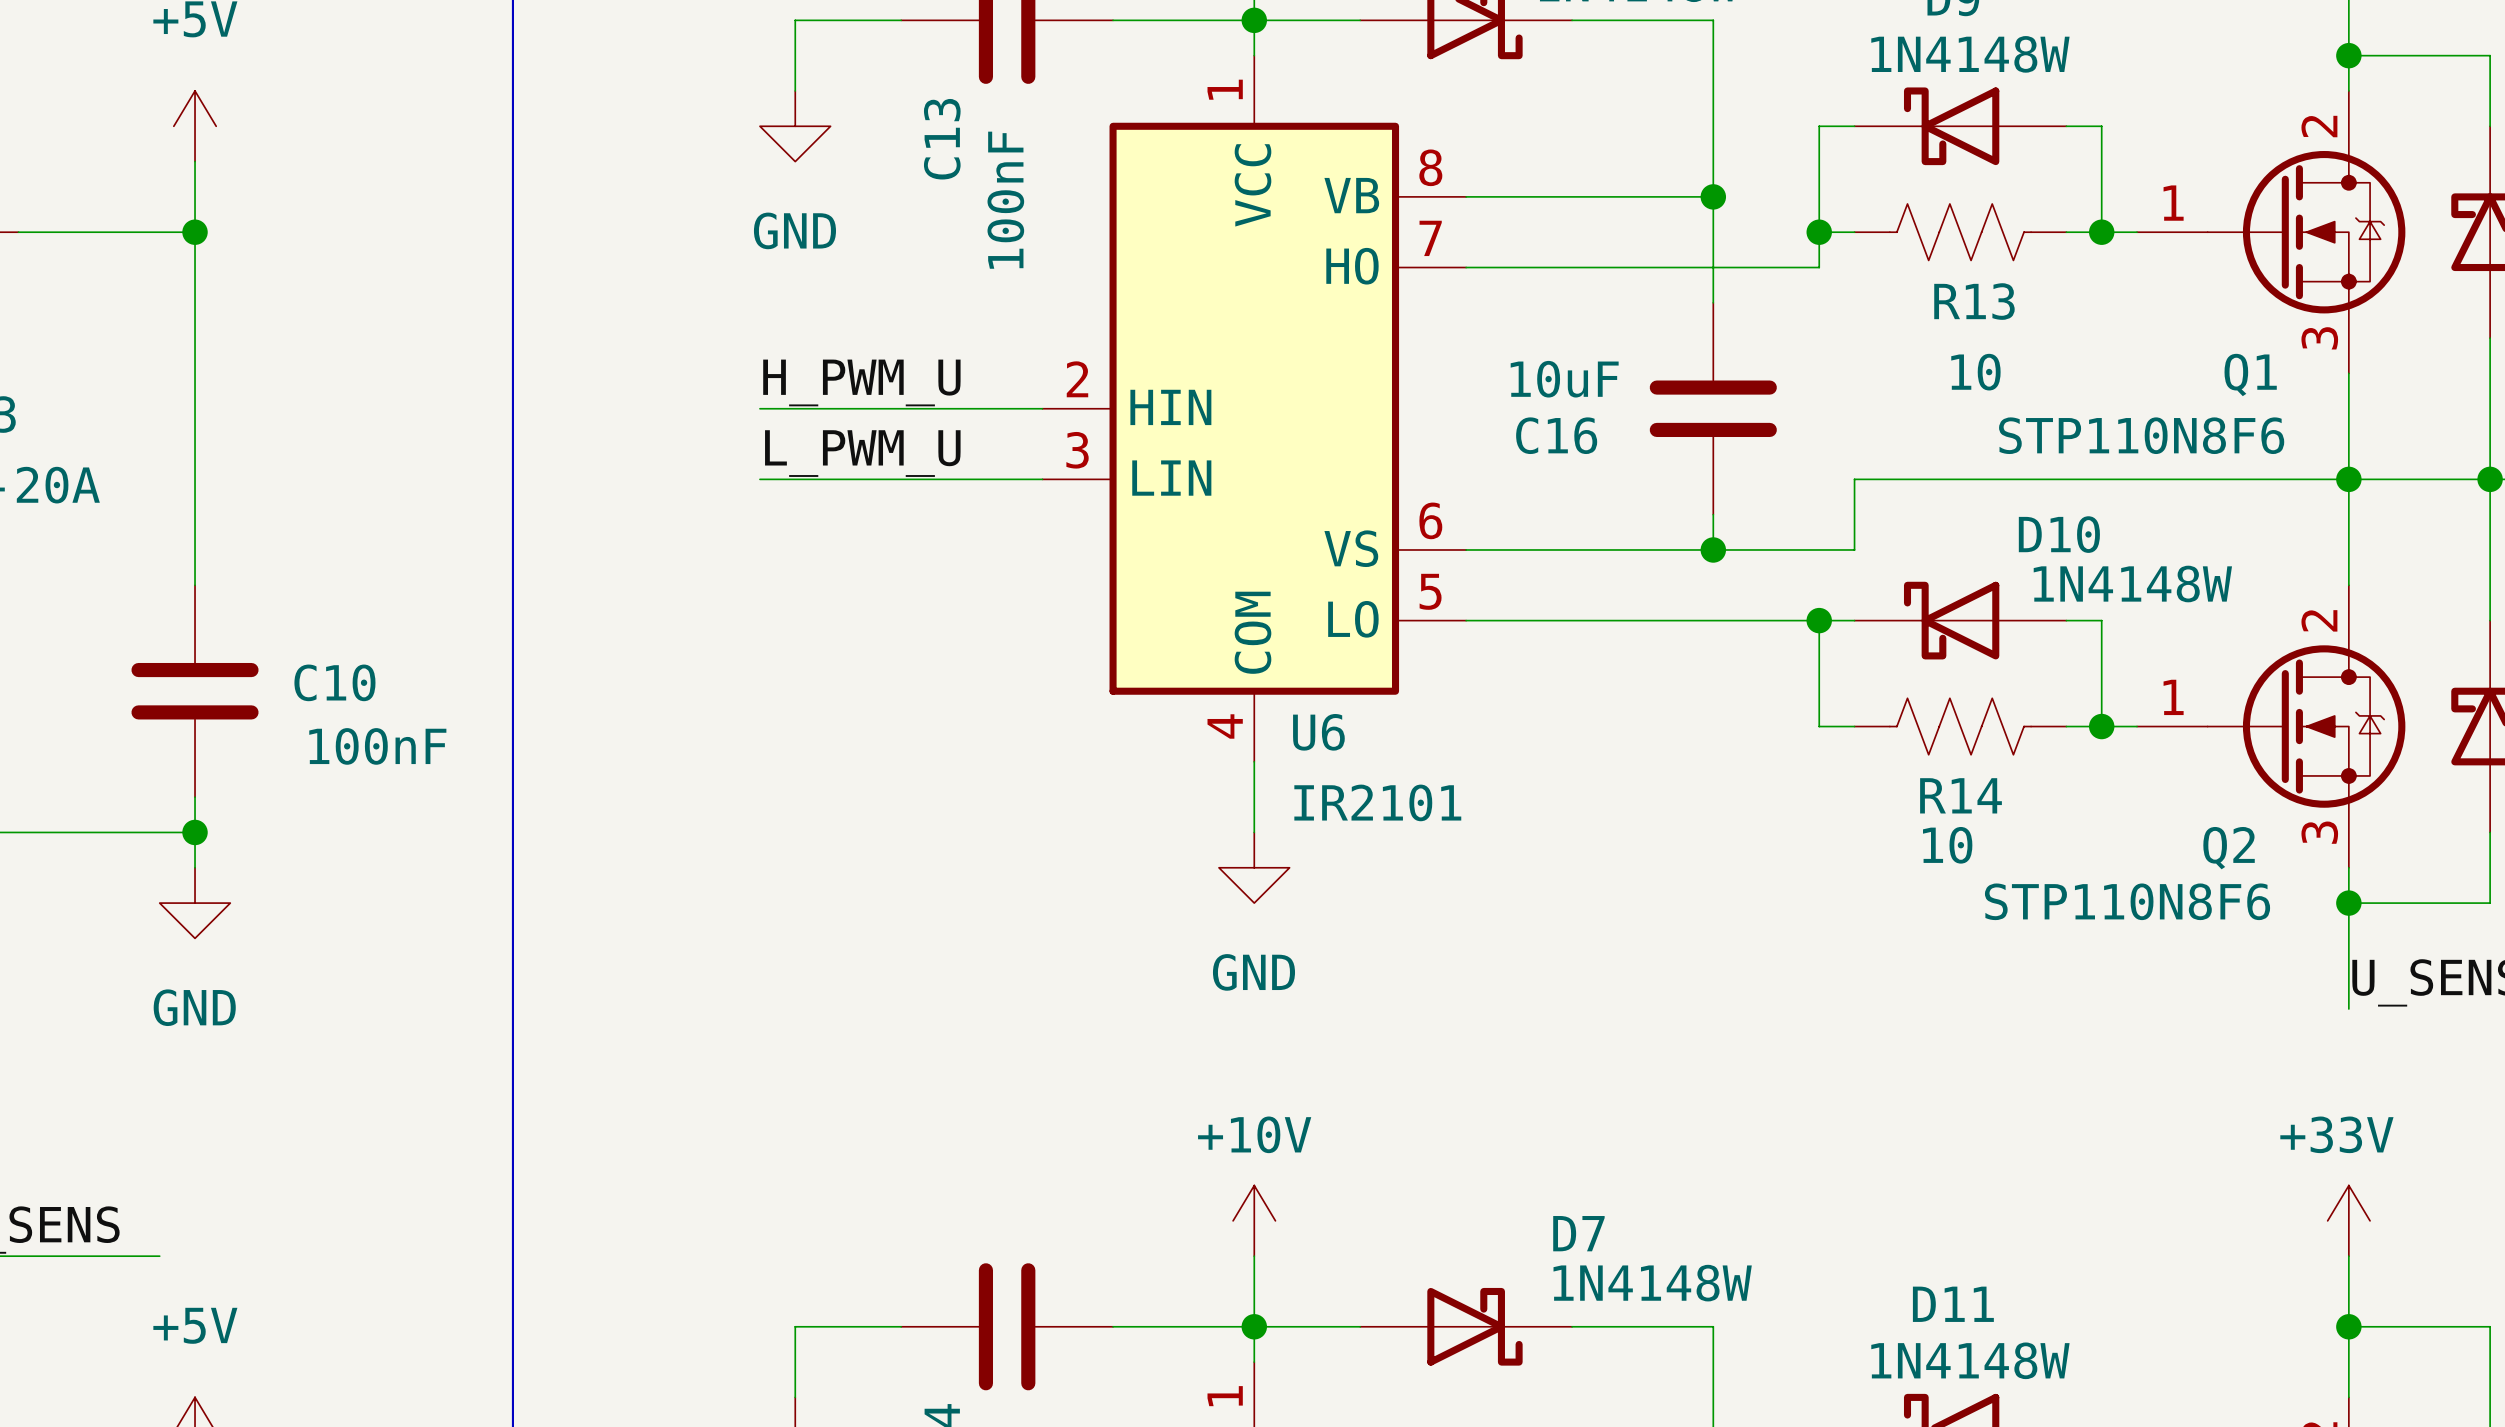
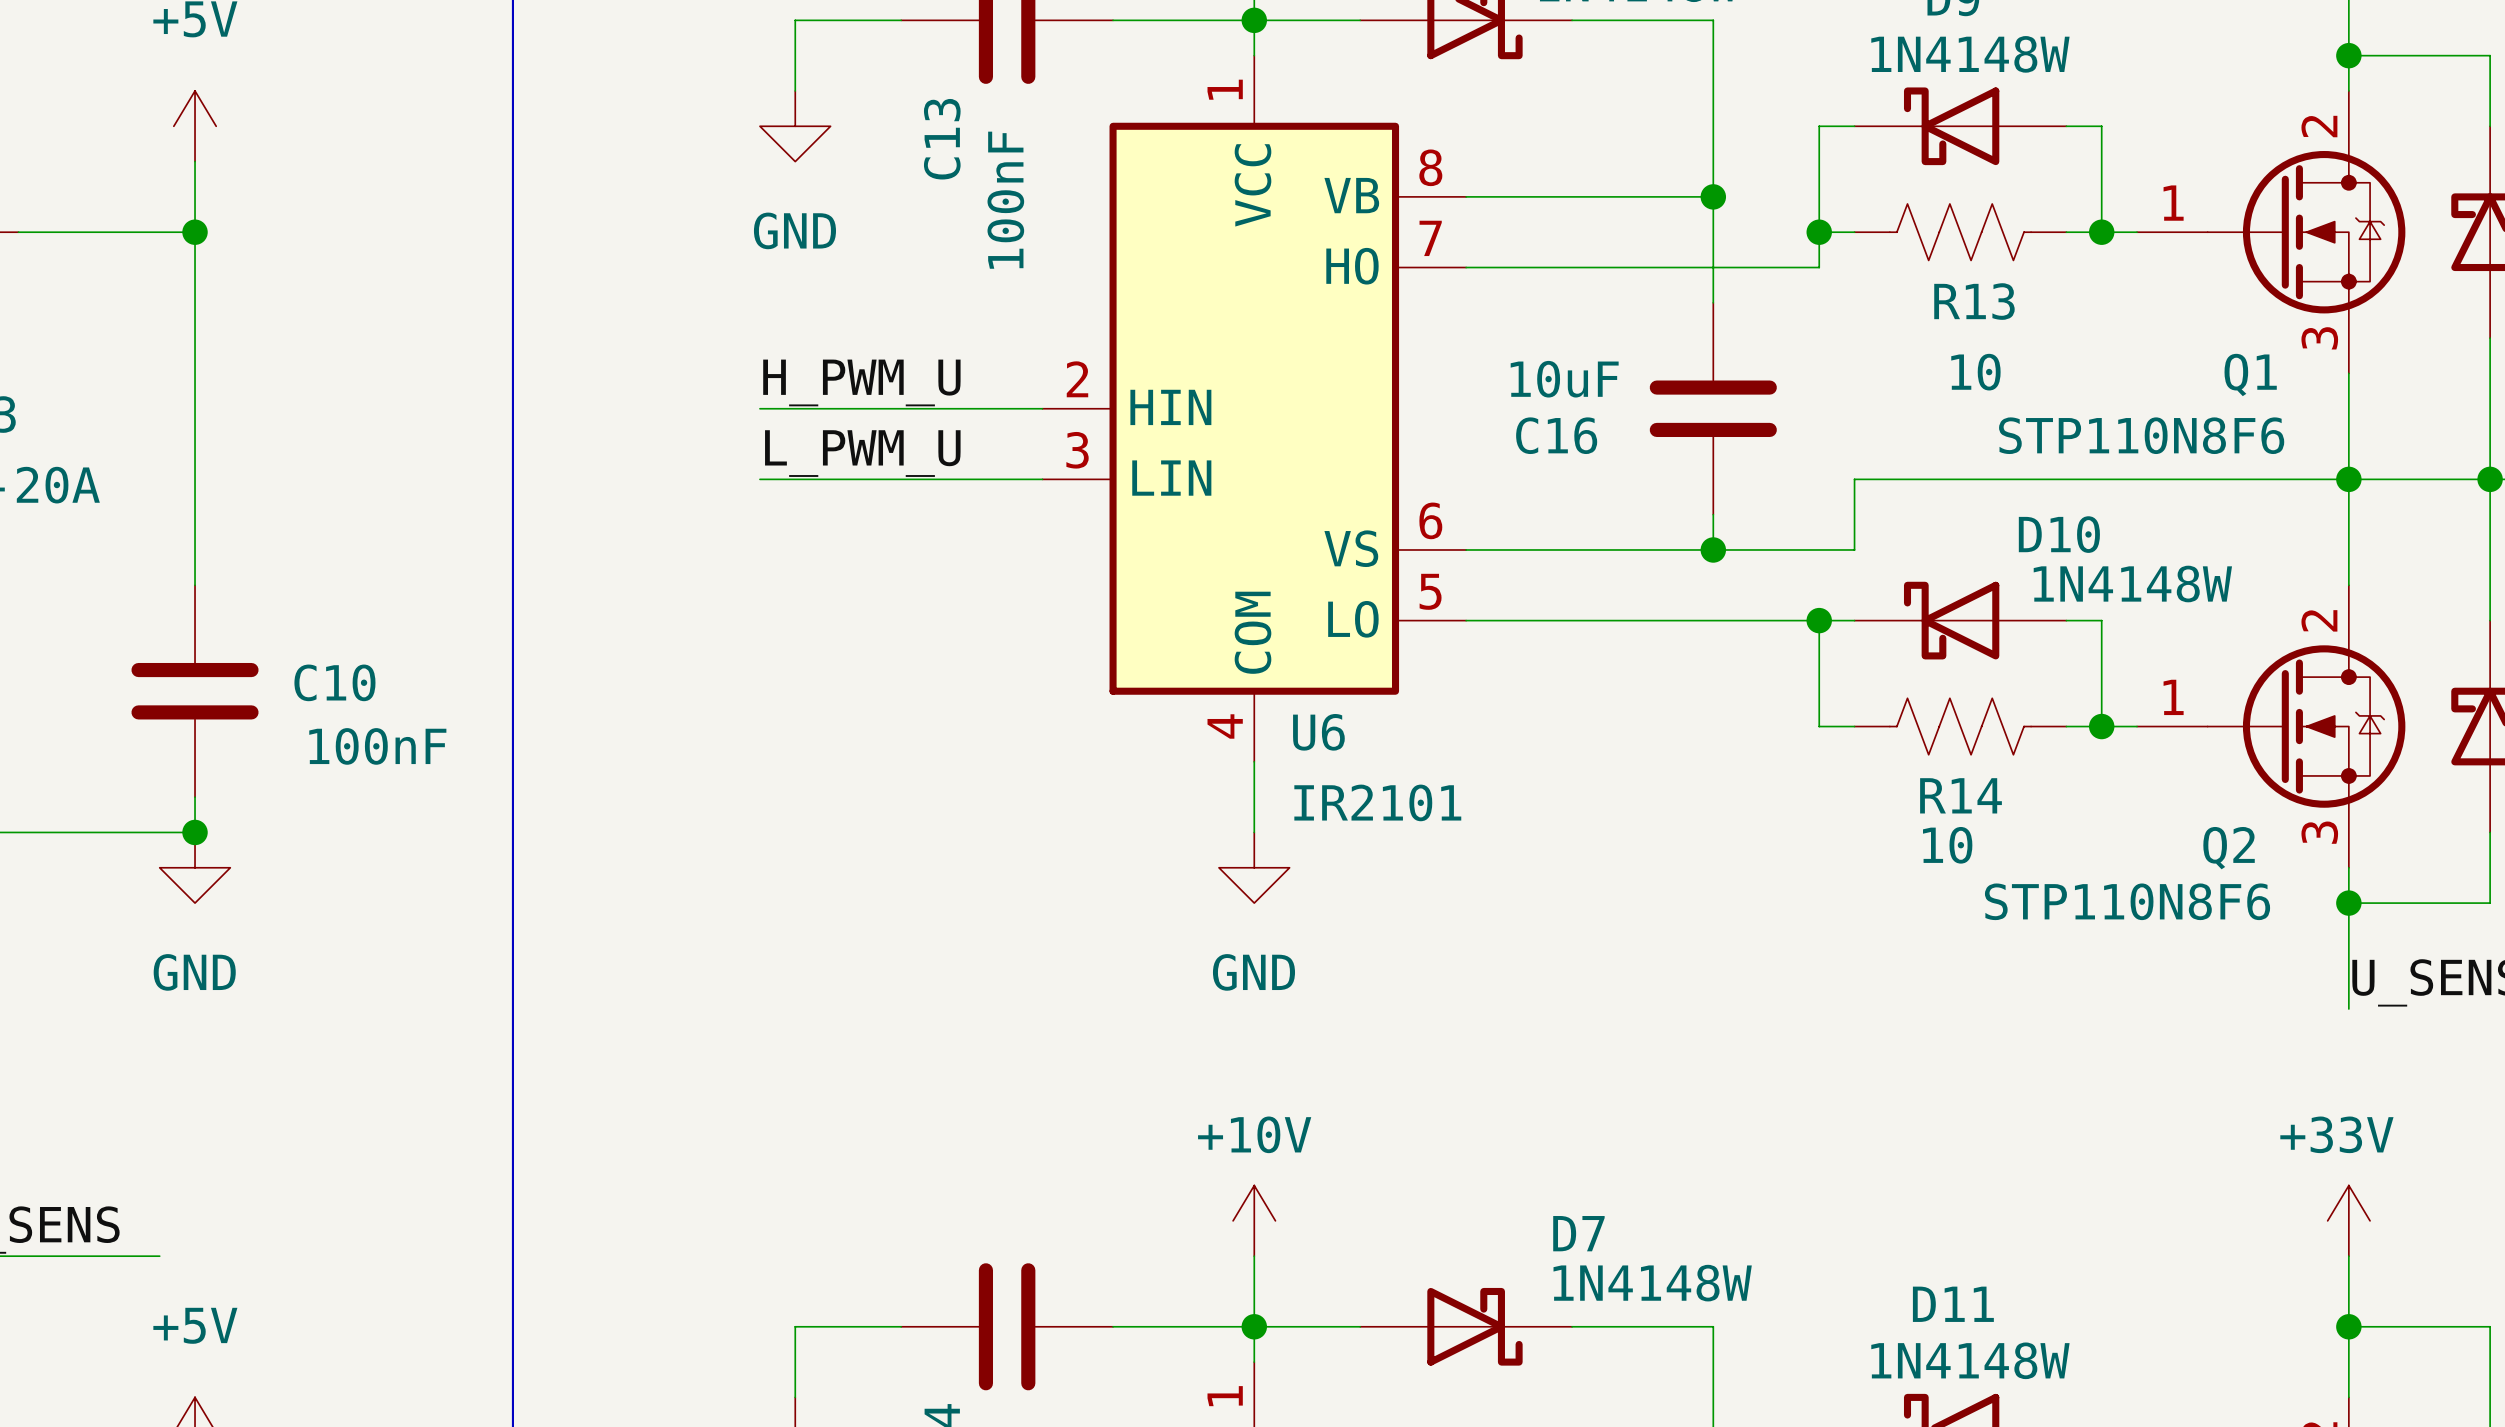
power symbol position: GND (195, 903) -> GND (195, 867)

